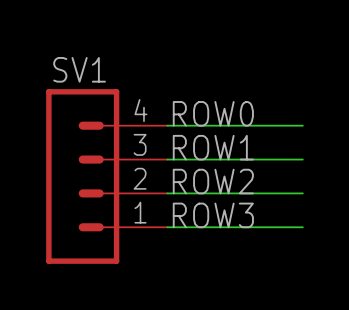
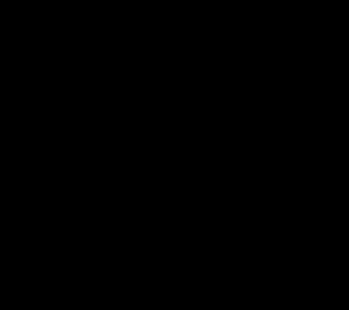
label: ROW0 (213, 113) -> none
wire: (167, 125) (302, 125) -> none
label: ROW1 (213, 147) -> none
wire: (167, 159) (302, 159) -> none
SV1: (106, 176) -> none
label: ROW2 (213, 181) -> none
wire: (167, 193) (302, 193) -> none
label: ROW3 (213, 215) -> none
wire: (167, 227) (302, 227) -> none

